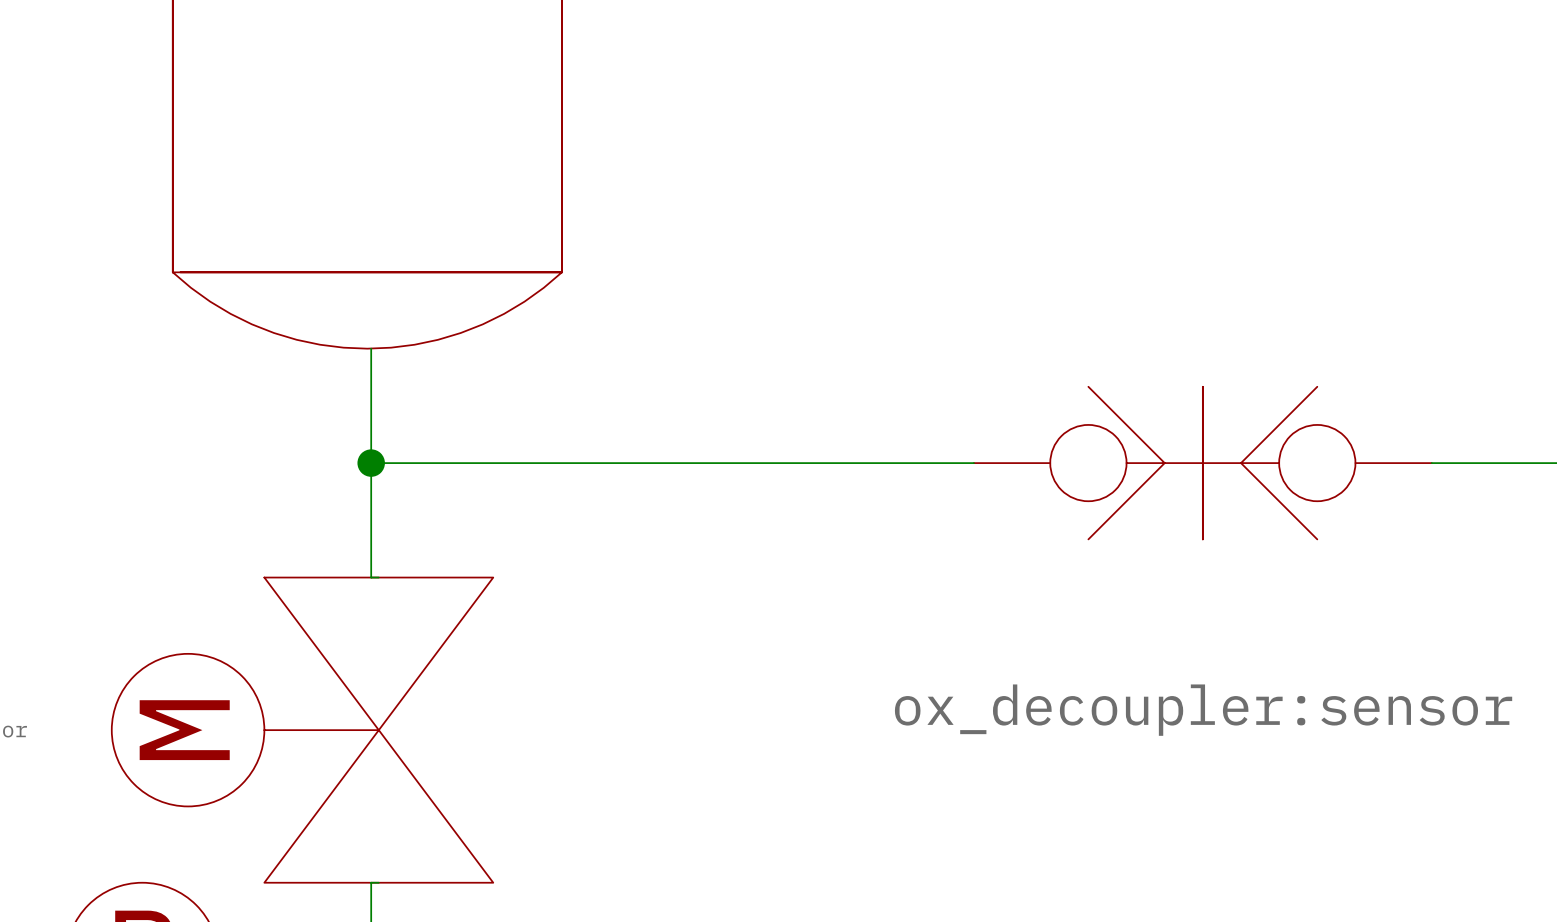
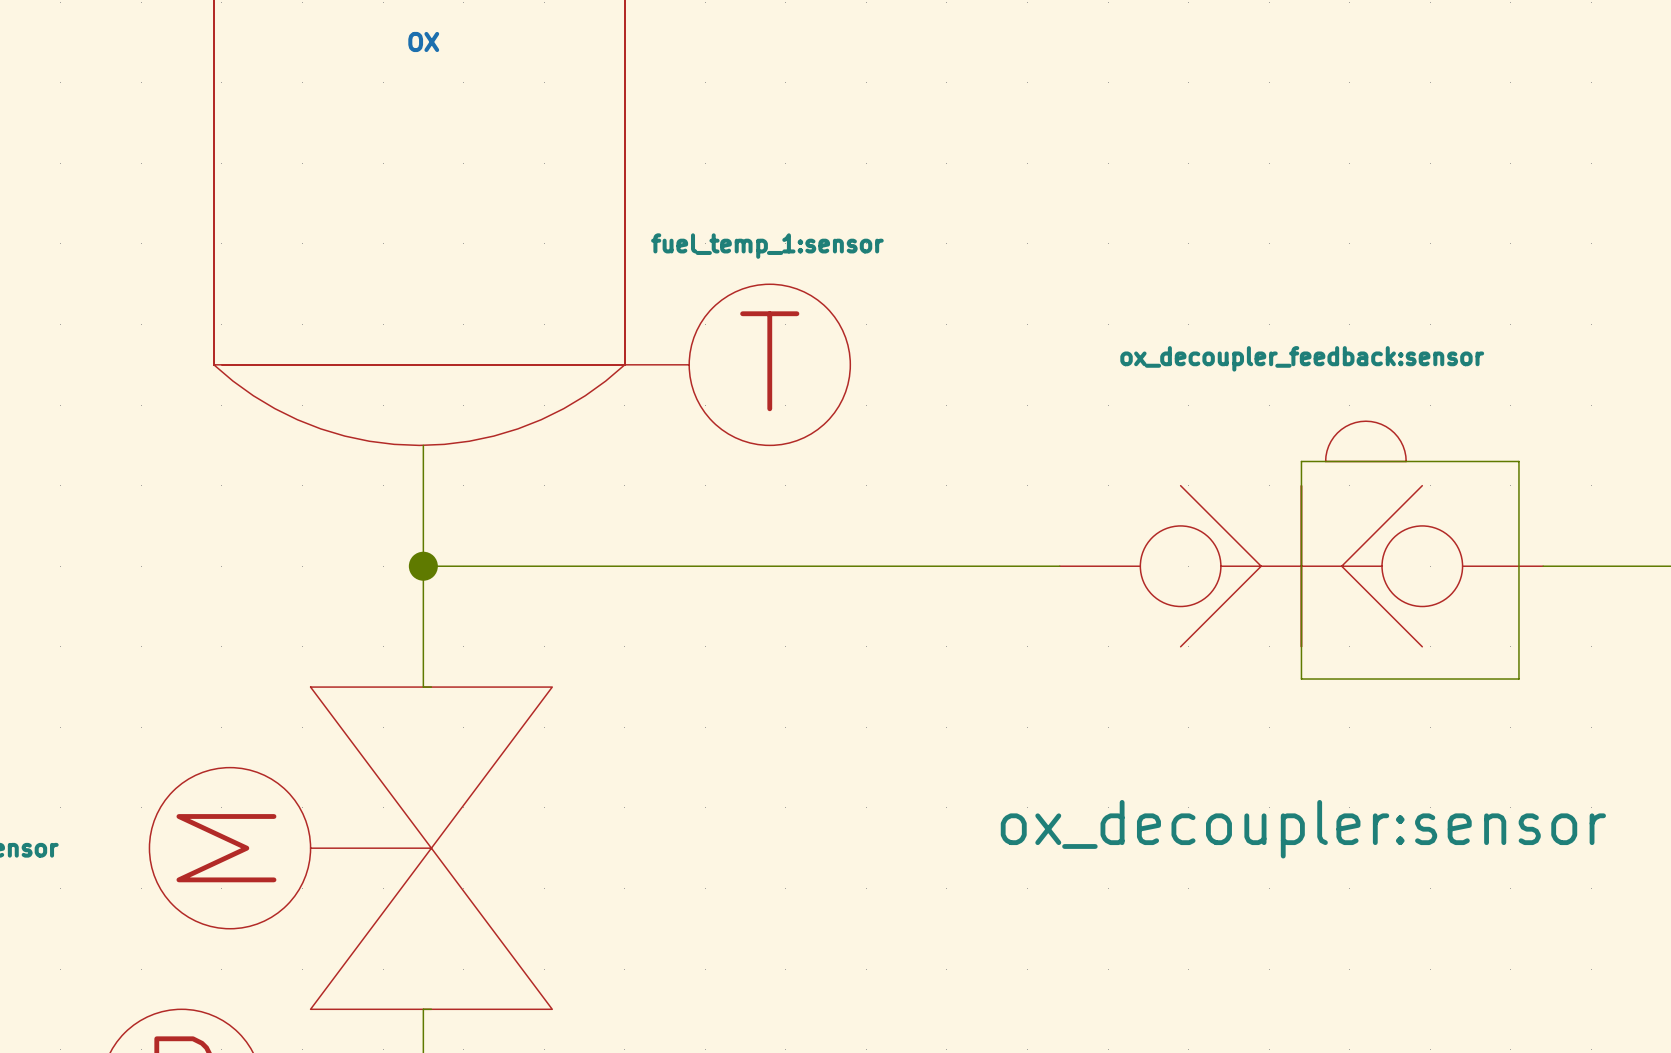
part: none -> fuel_temp_1:sensor (689, 364)
part: none -> ox_decoupler_feedback:sensor (1365, 441)
wire: none -> (1301, 461) (1518, 461) (1518, 679) (1301, 679) (1301, 461)

